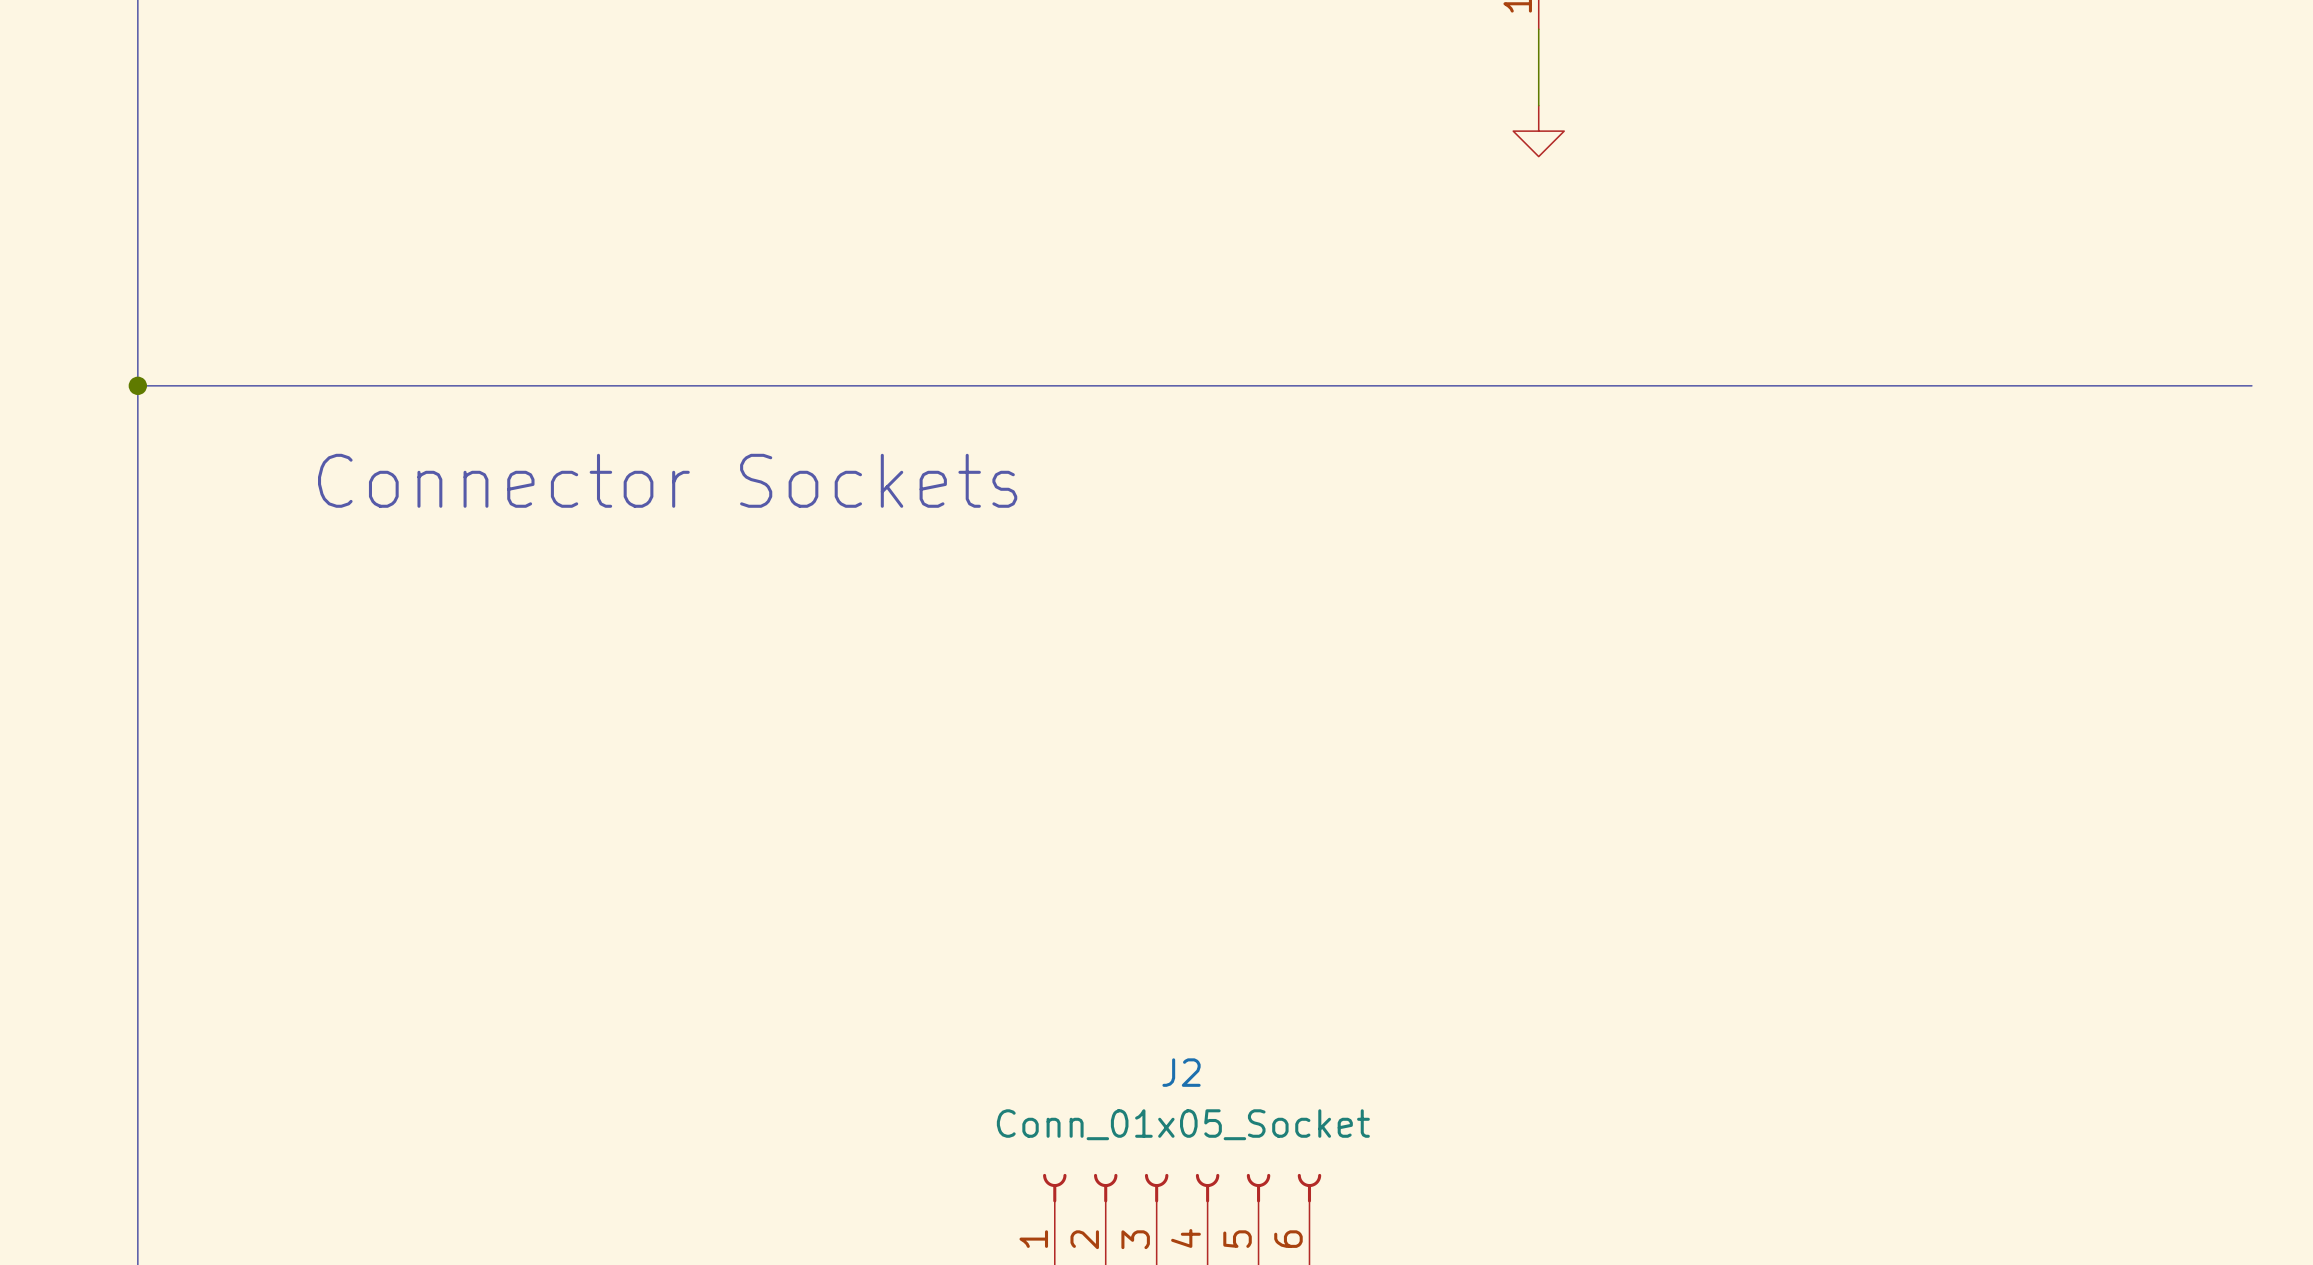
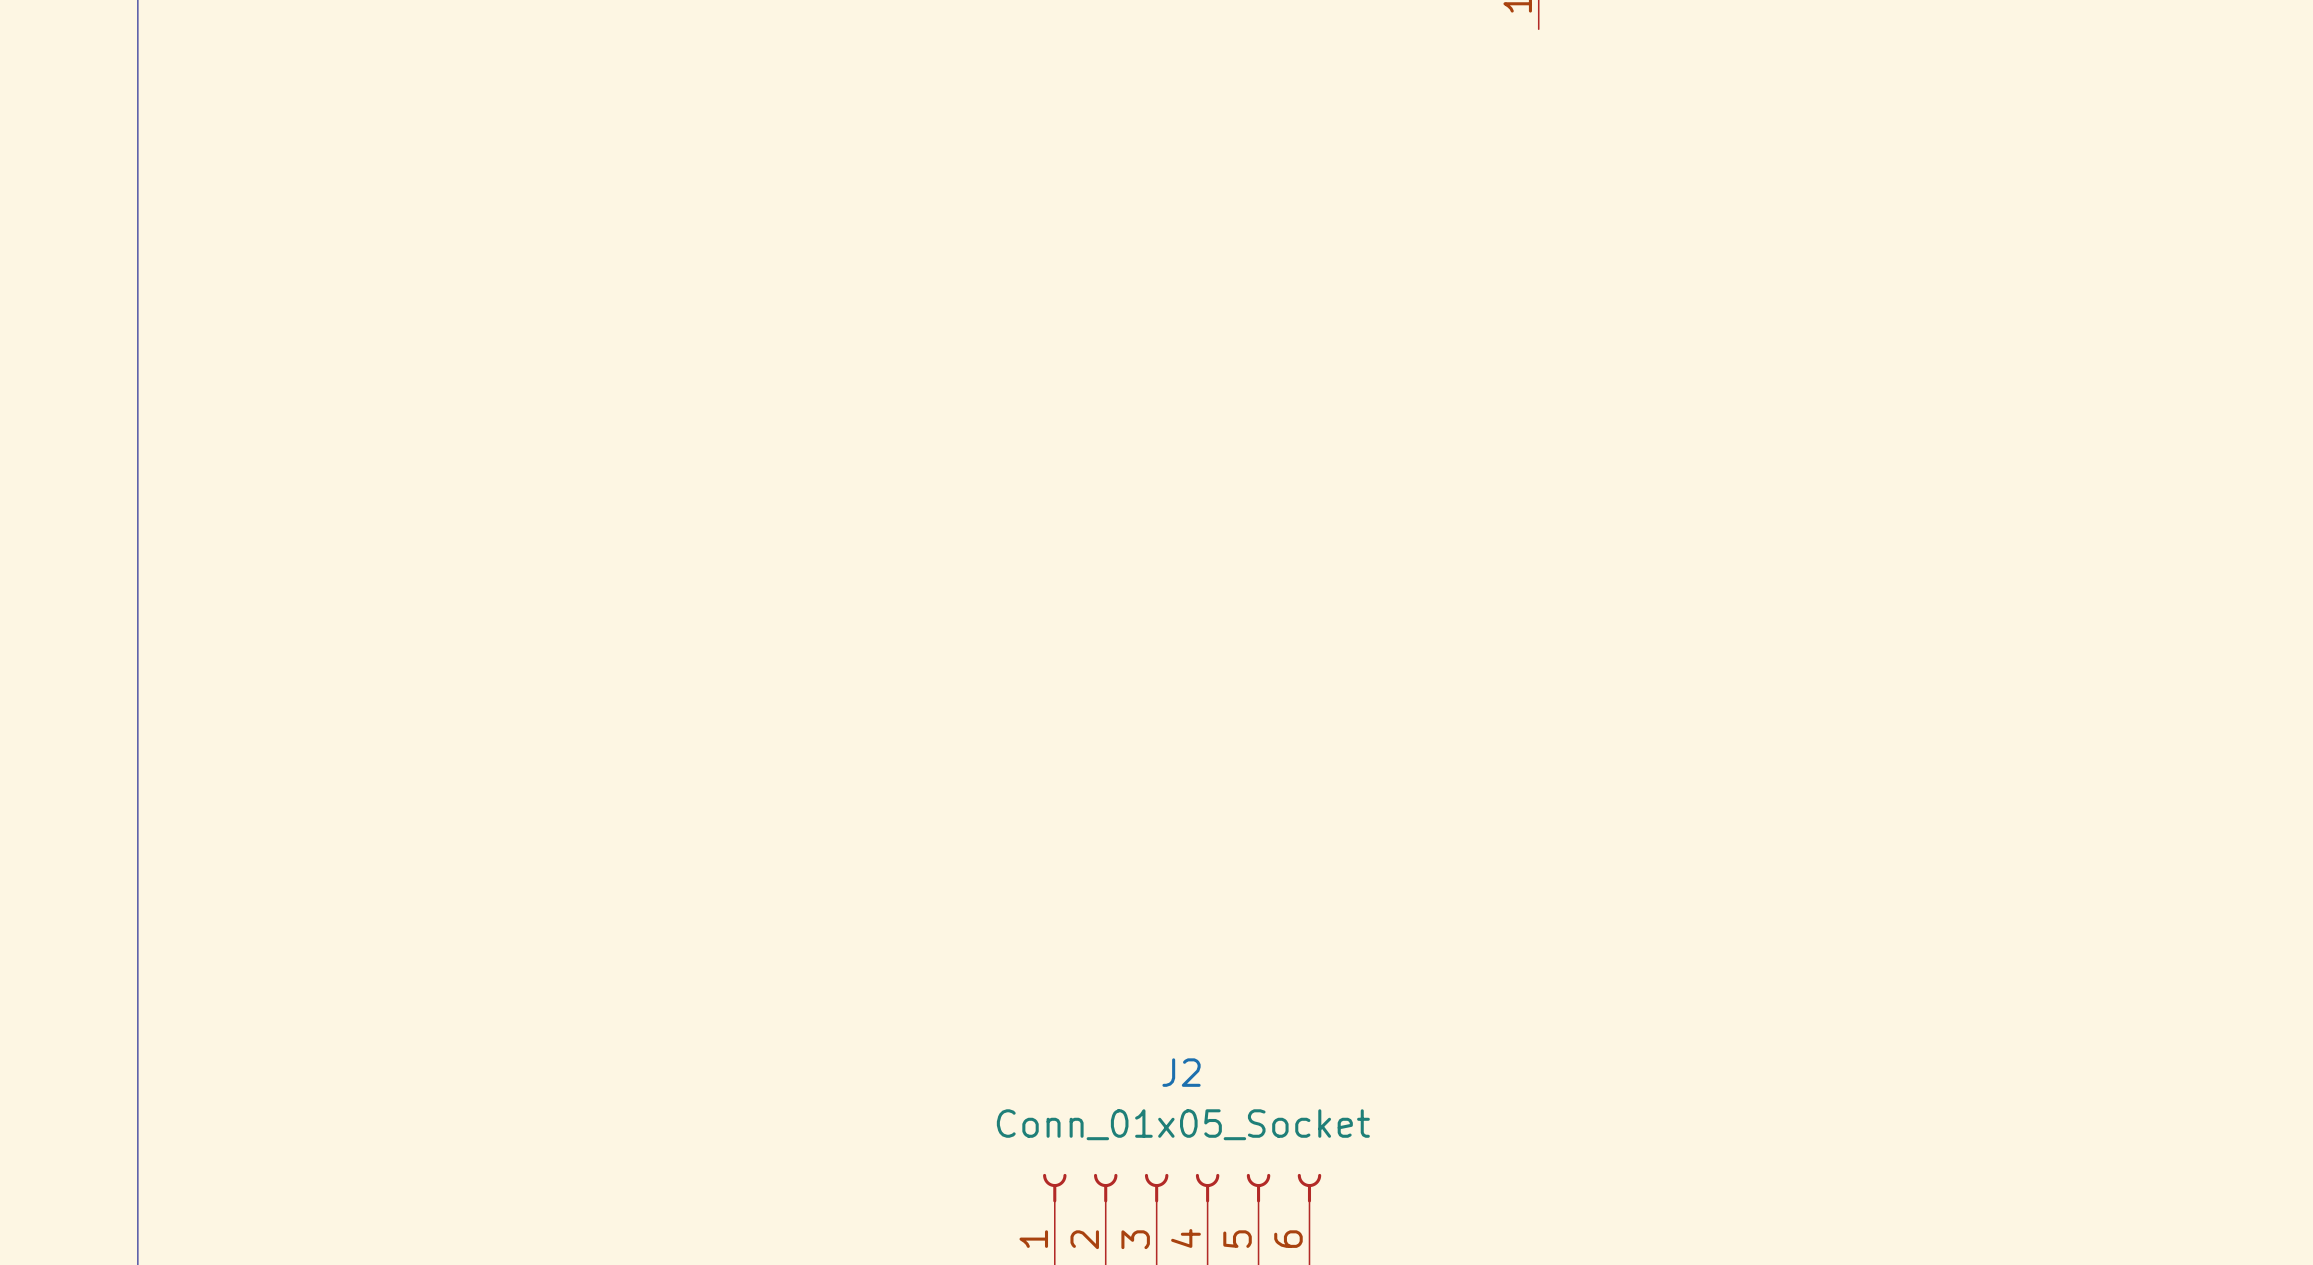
wire: (1538, 29) (1538, 105) -> none
power symbol: (1538, 131) -> none
bus: (137, 385) (2251, 385) -> none
junction: (137, 385) -> none
text: Connector Sockets (667, 480) -> none

